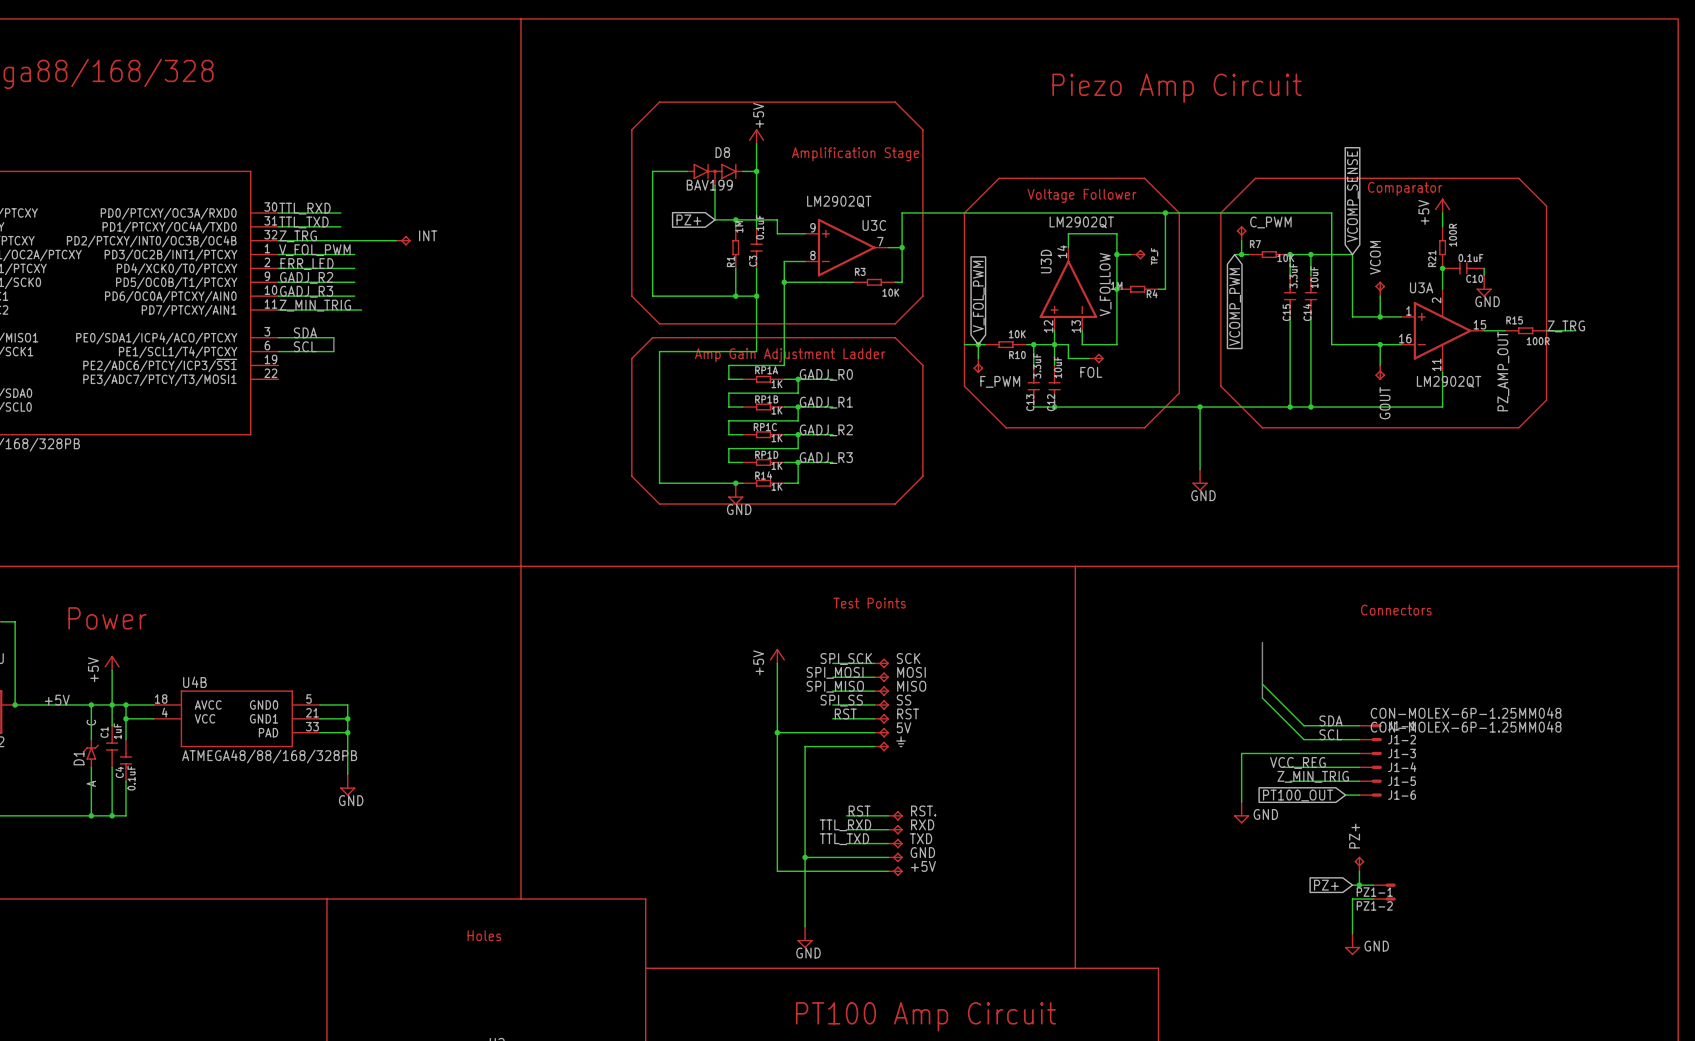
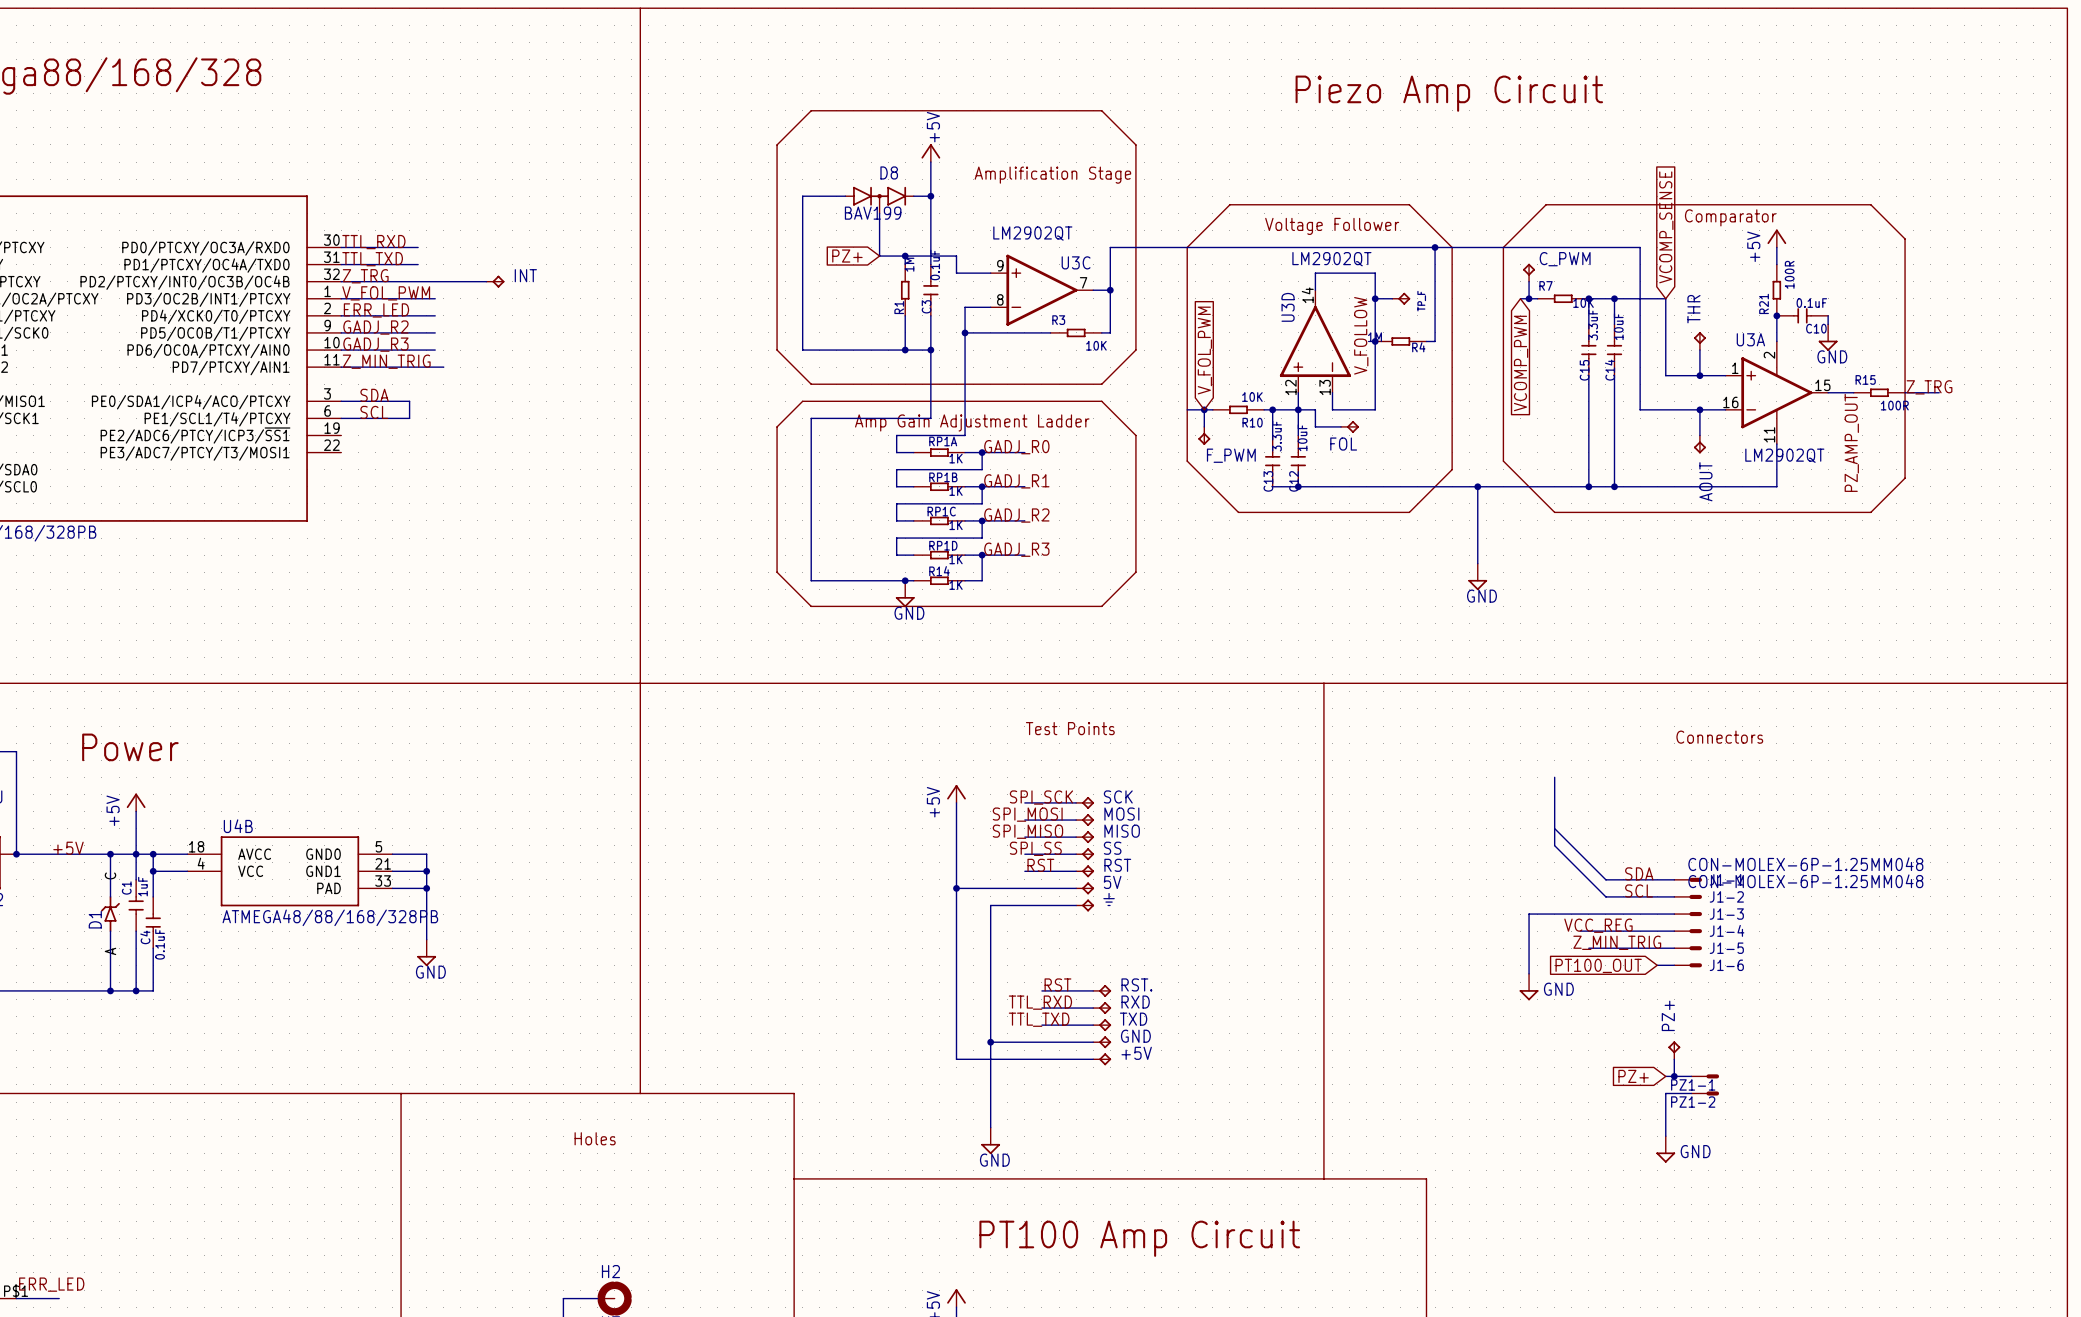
VCOM name: VCOM (1375, 257) -> THR (1693, 309)
GOUT name: GOUT (1385, 403) -> AOUT (1705, 481)

